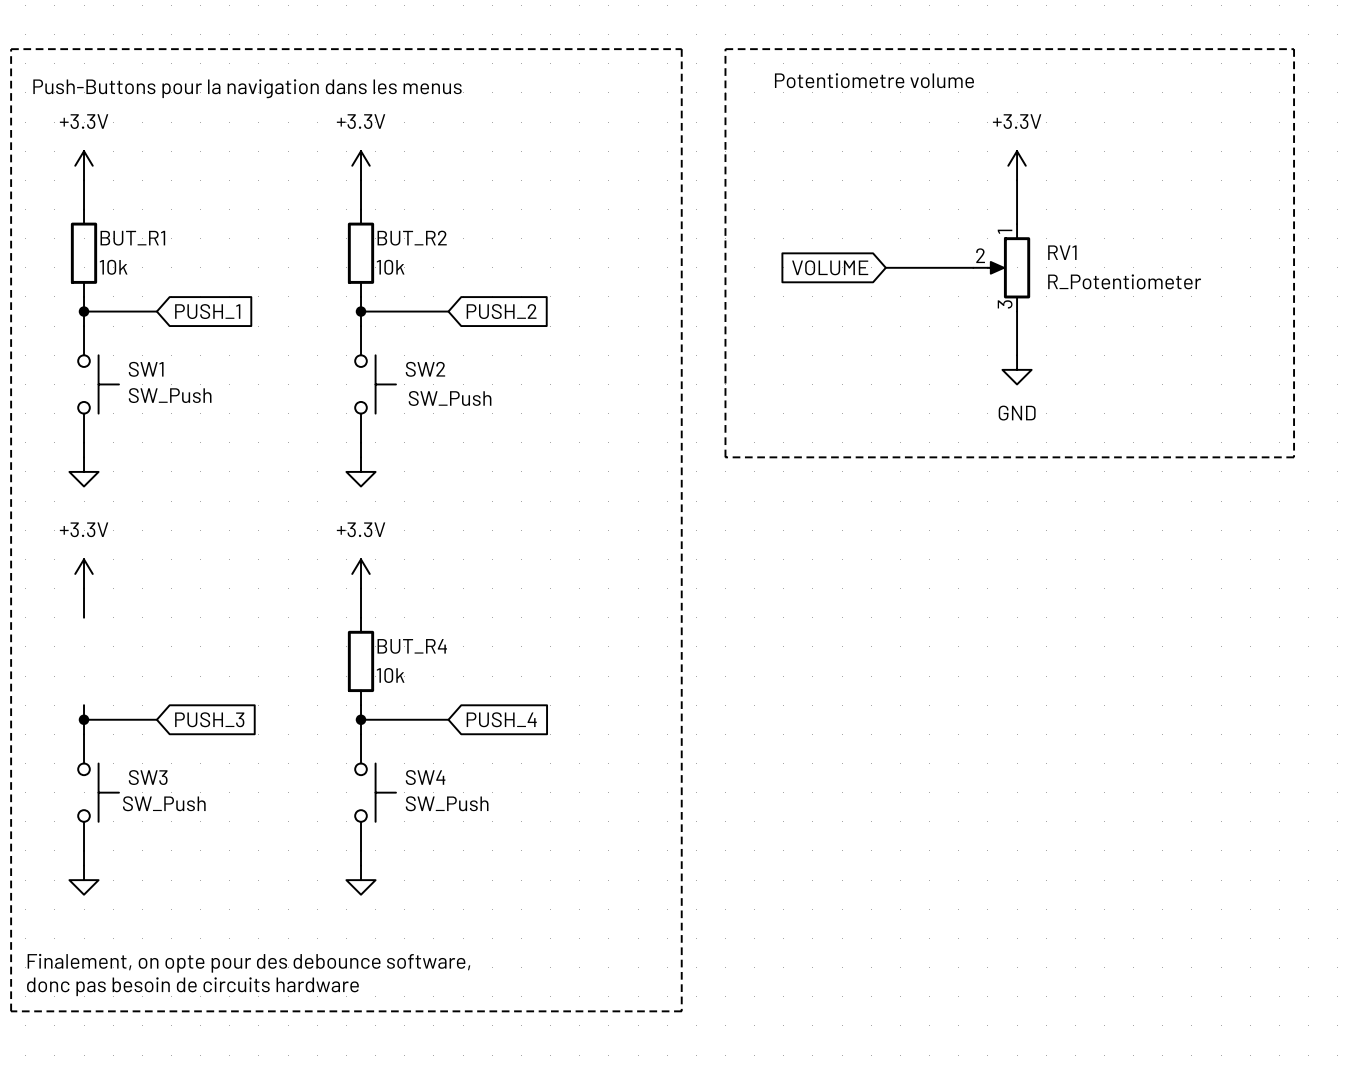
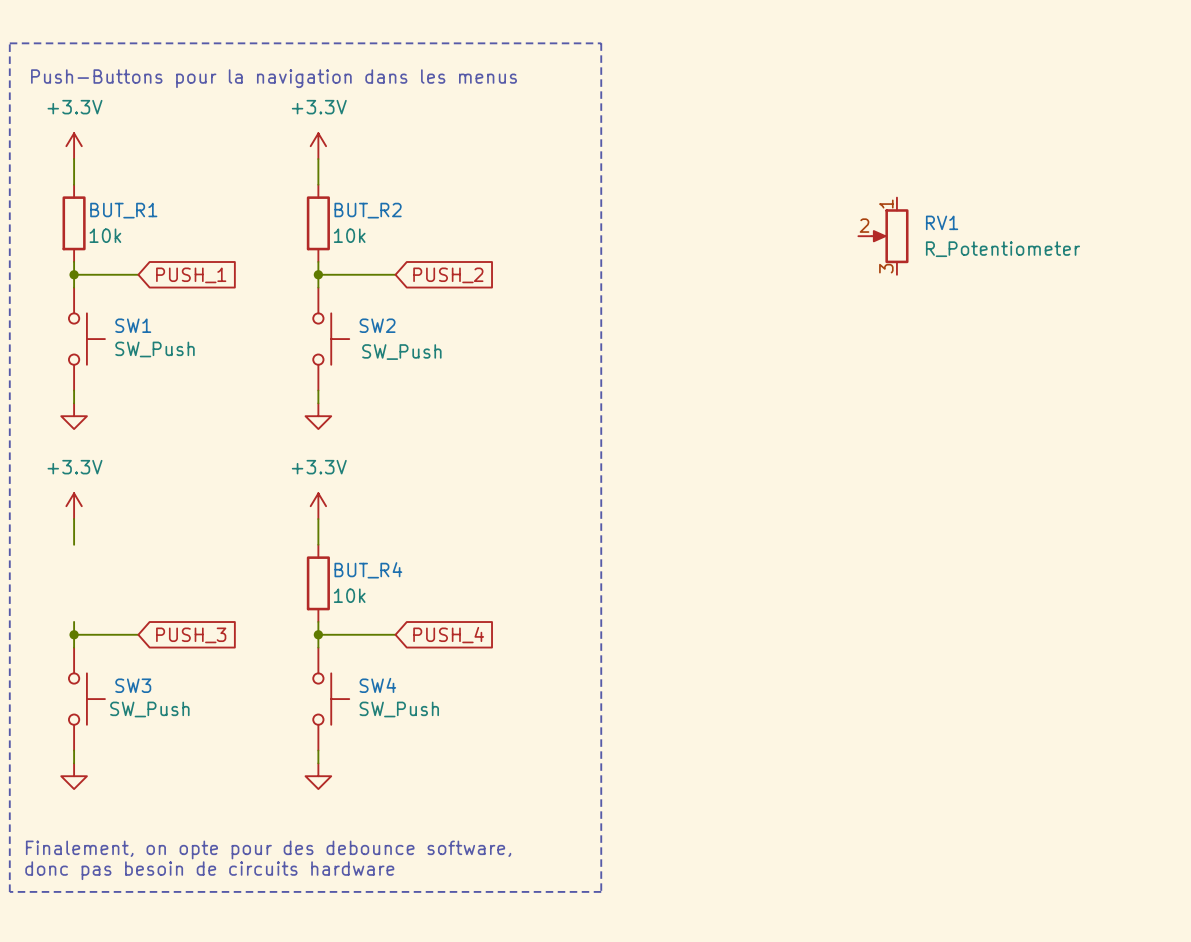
line: (725, 49) (1294, 49) (1294, 457) (725, 457) (725, 49) -> none
text: Potentiometre volume (874, 80) -> none
power symbol: +3.3V (1017, 165) -> none
wire: (1017, 180) (1017, 224) -> none
global label: VOLUME (830, 267) -> none
wire: (885, 267) (973, 267) -> none
wire: (1017, 311) (1017, 355) -> none
power symbol: GND (1017, 369) -> none

